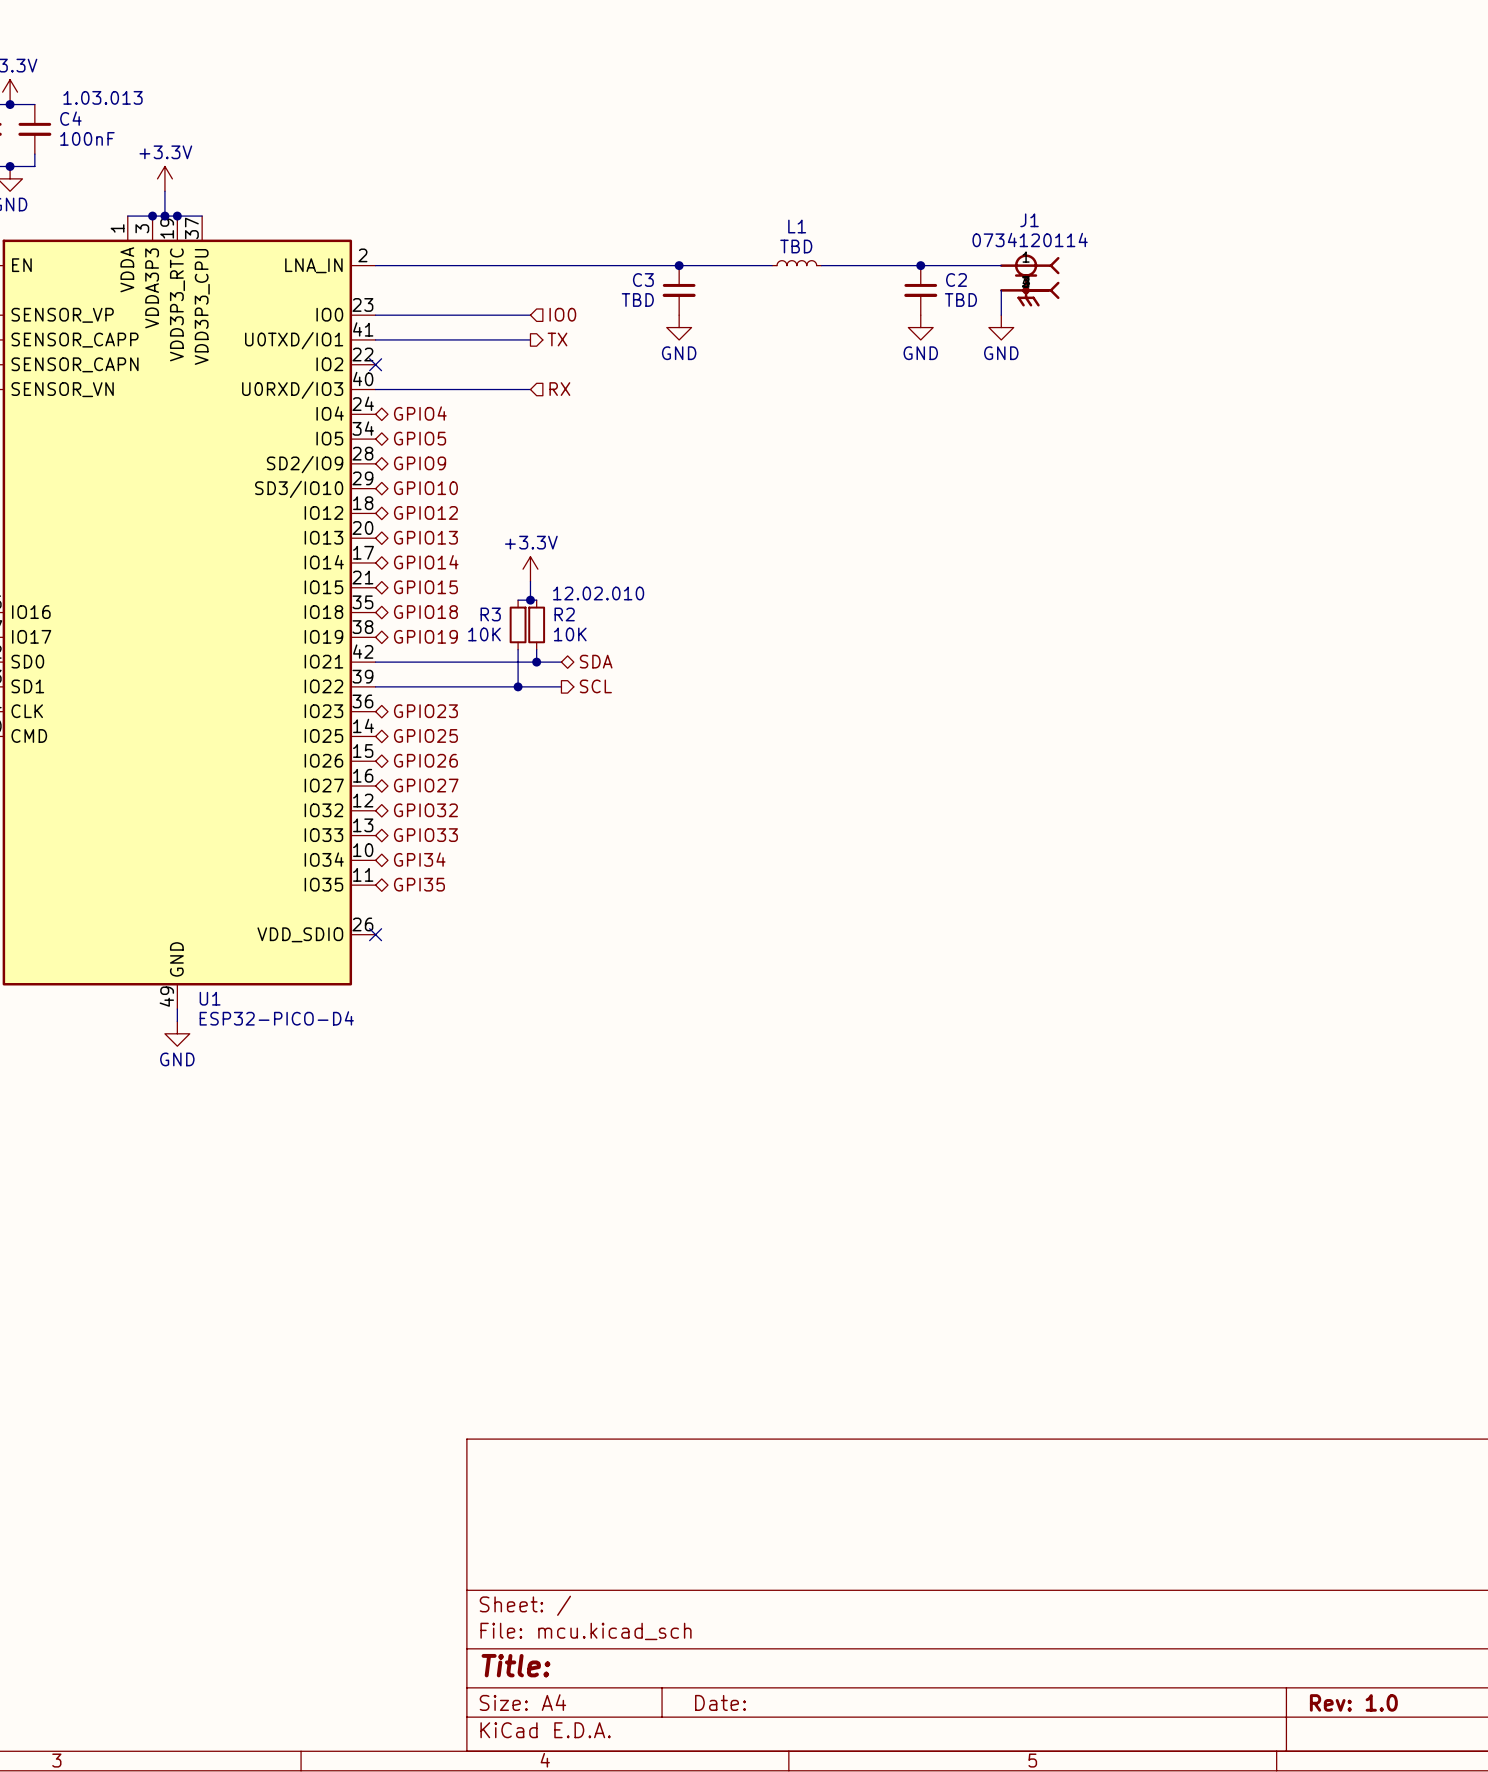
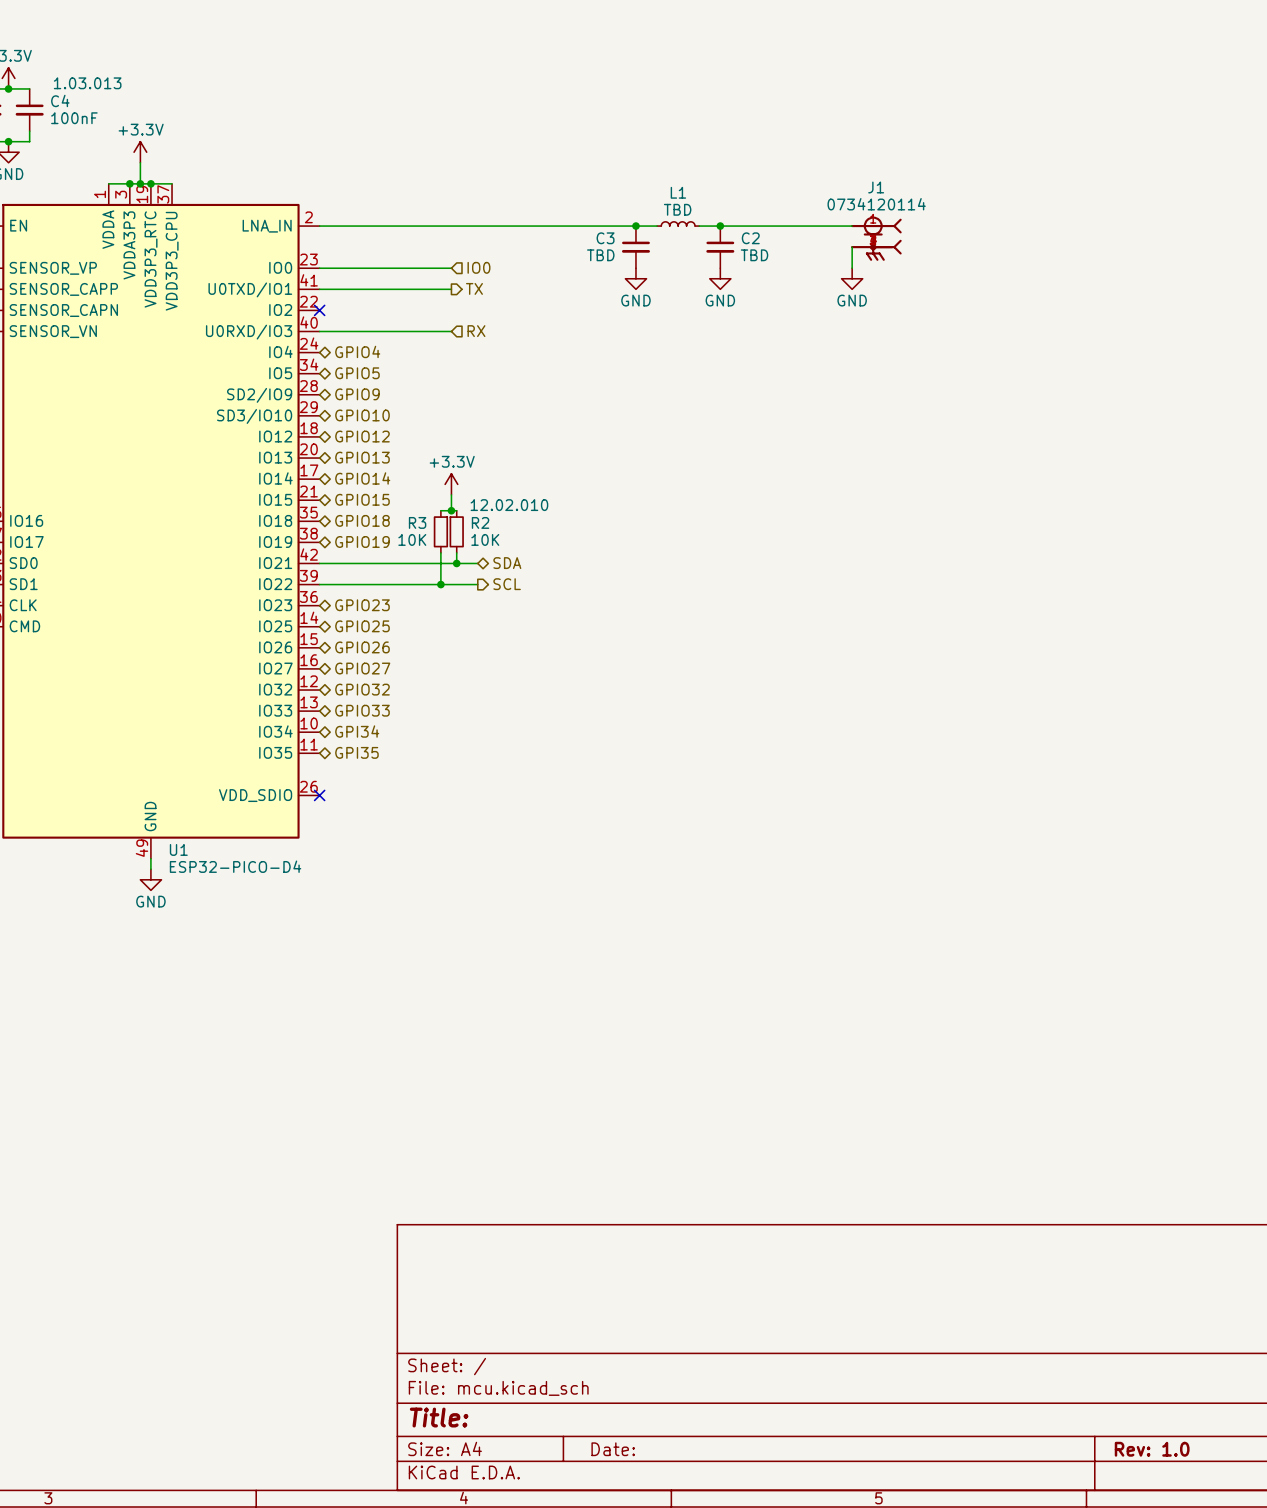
junction: (679, 265) -> none
junction: none -> (635, 226)
junction: none -> (720, 226)
junction: (920, 265) -> none
C3 position: (679, 290) -> (635, 247)
C2 position: (920, 290) -> (720, 247)
power symbol position: GND (679, 327) -> GND (635, 278)
power symbol position: GND (920, 327) -> GND (720, 278)

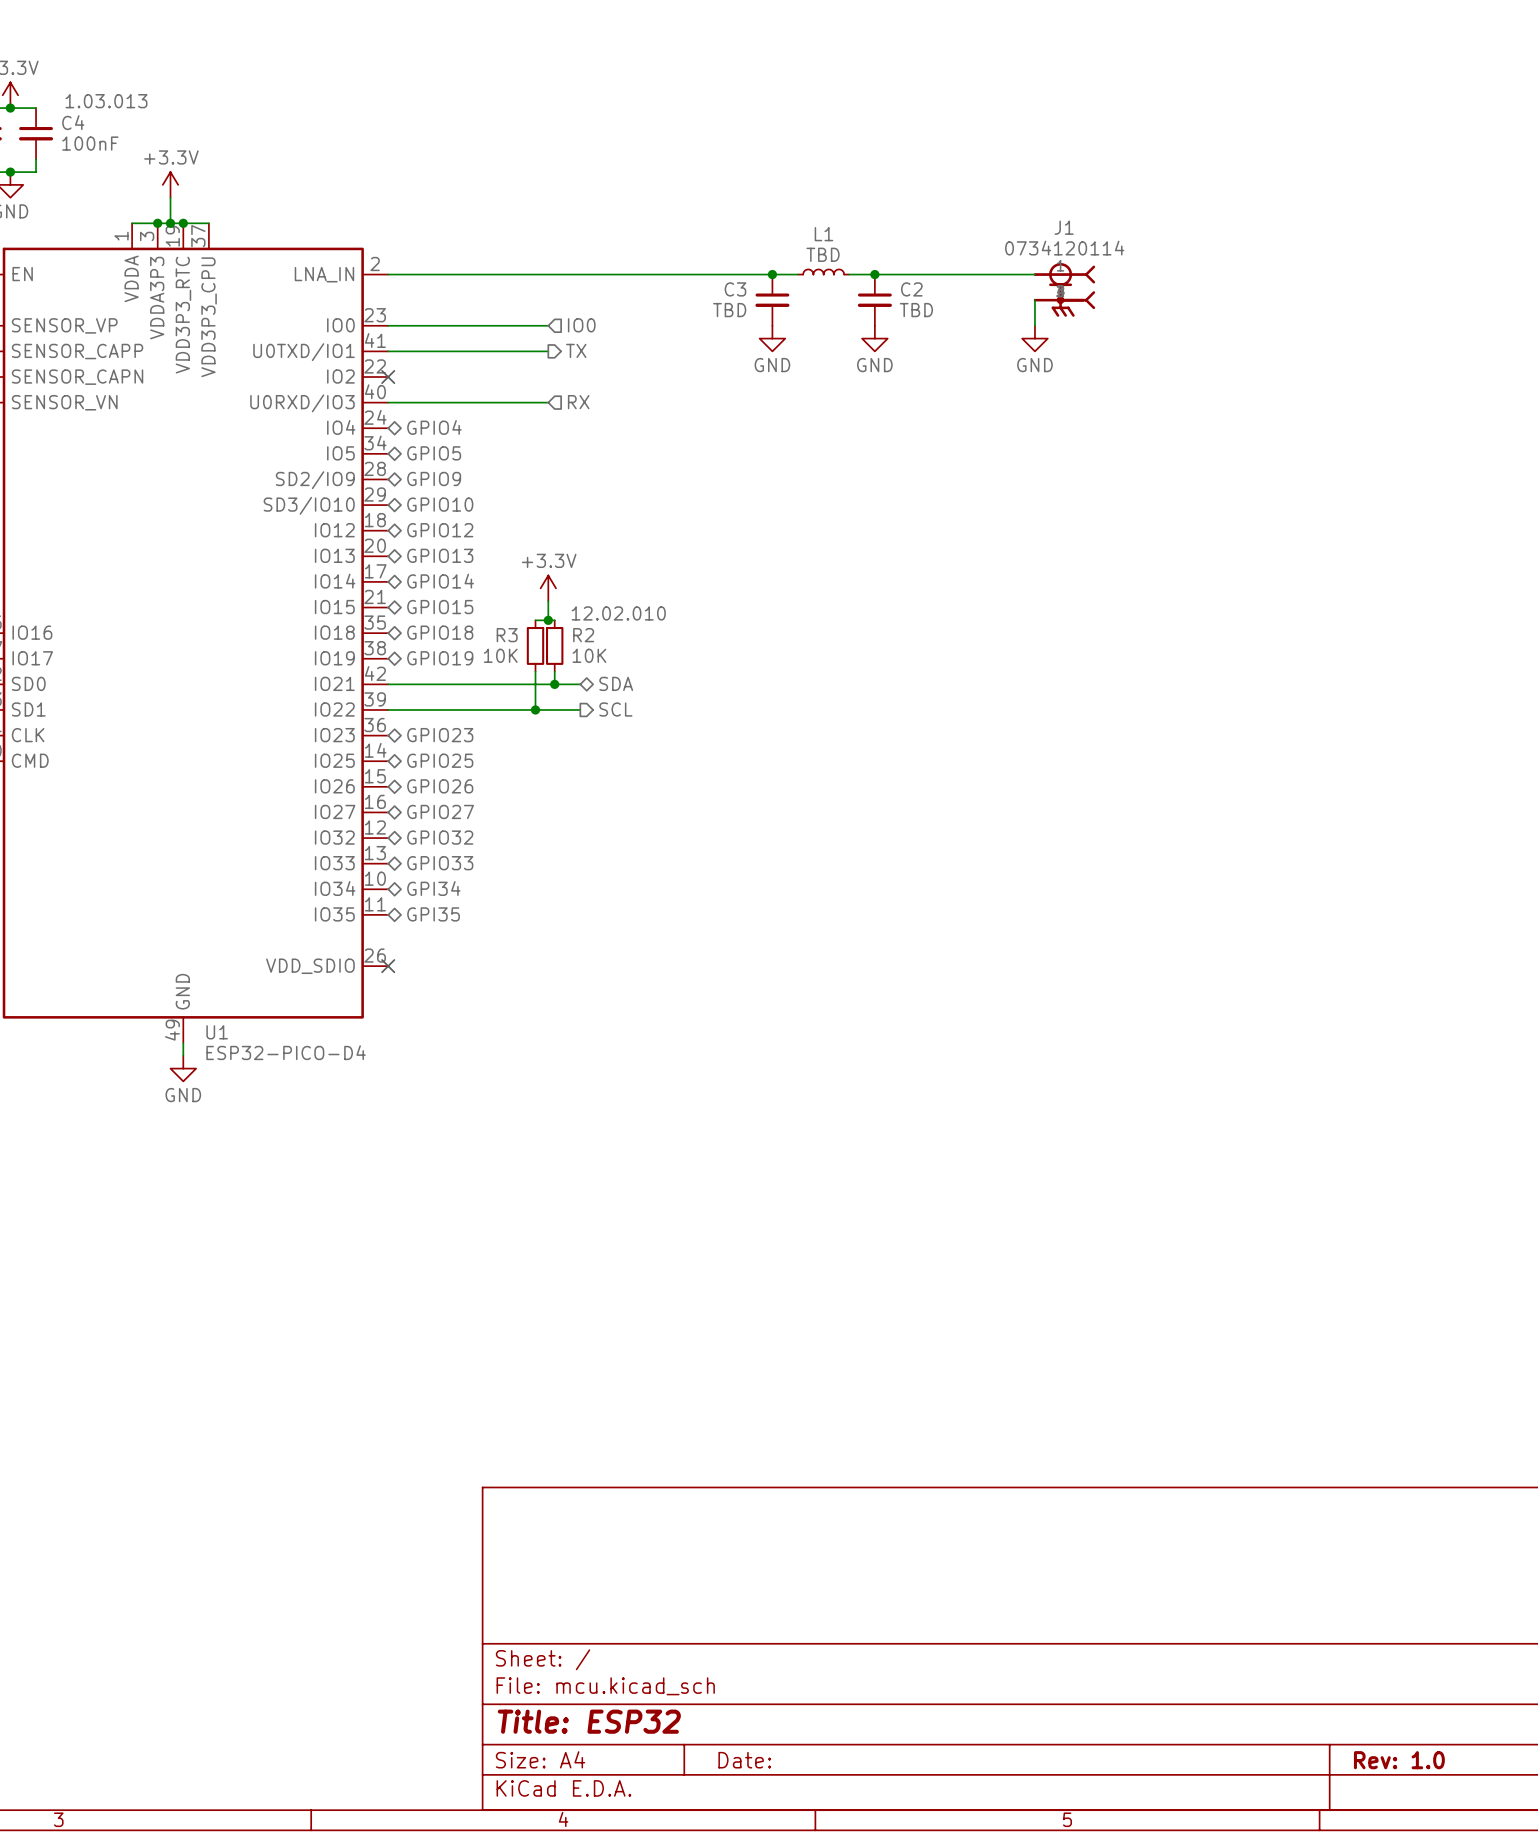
title block: Title: (439, 1417) -> Title: ESP32 (589, 1721)

